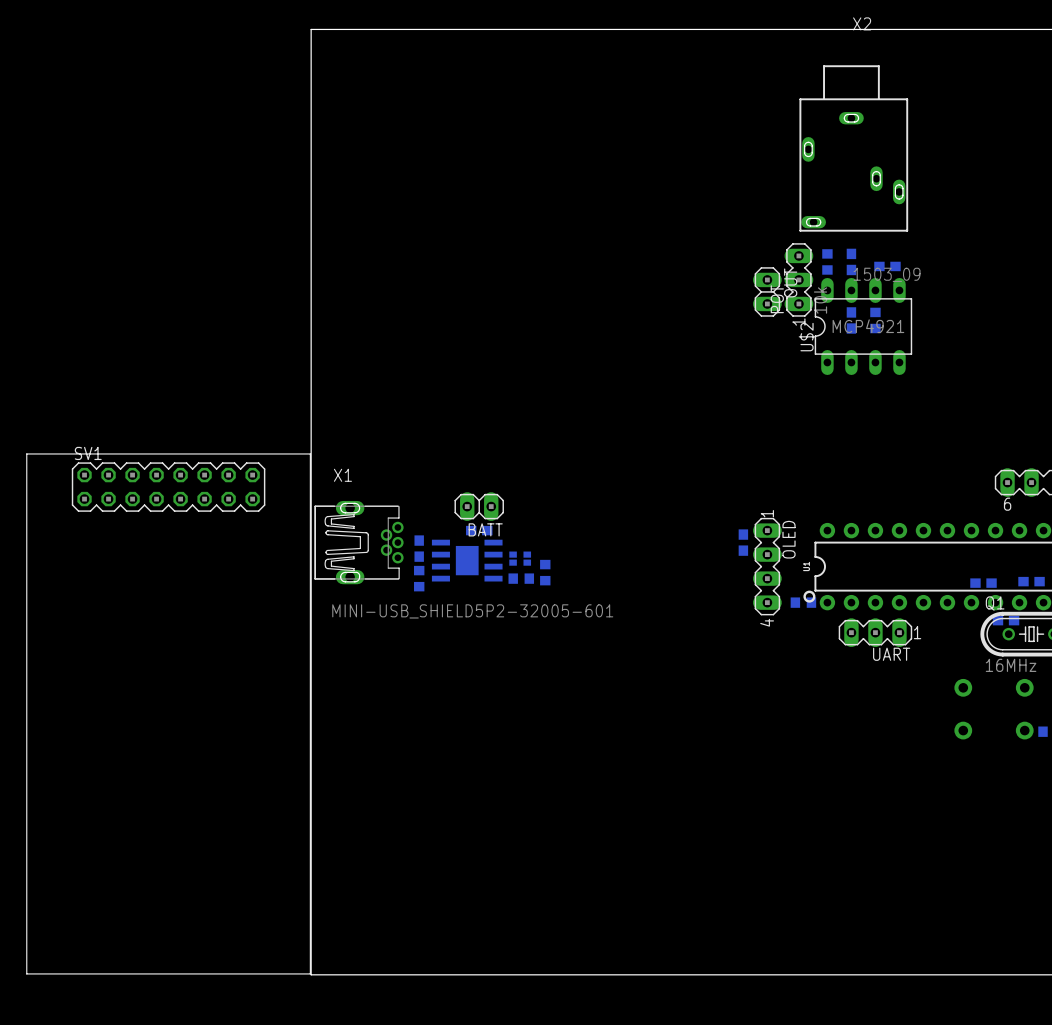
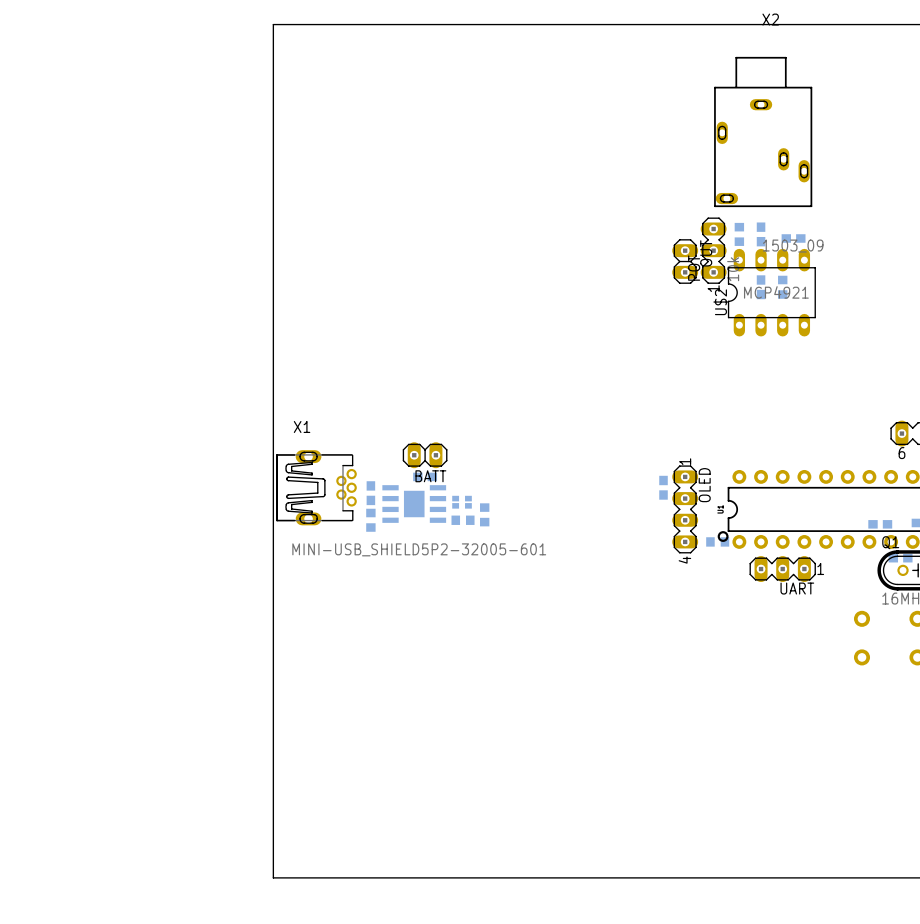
SV1: (168, 713) -> none

